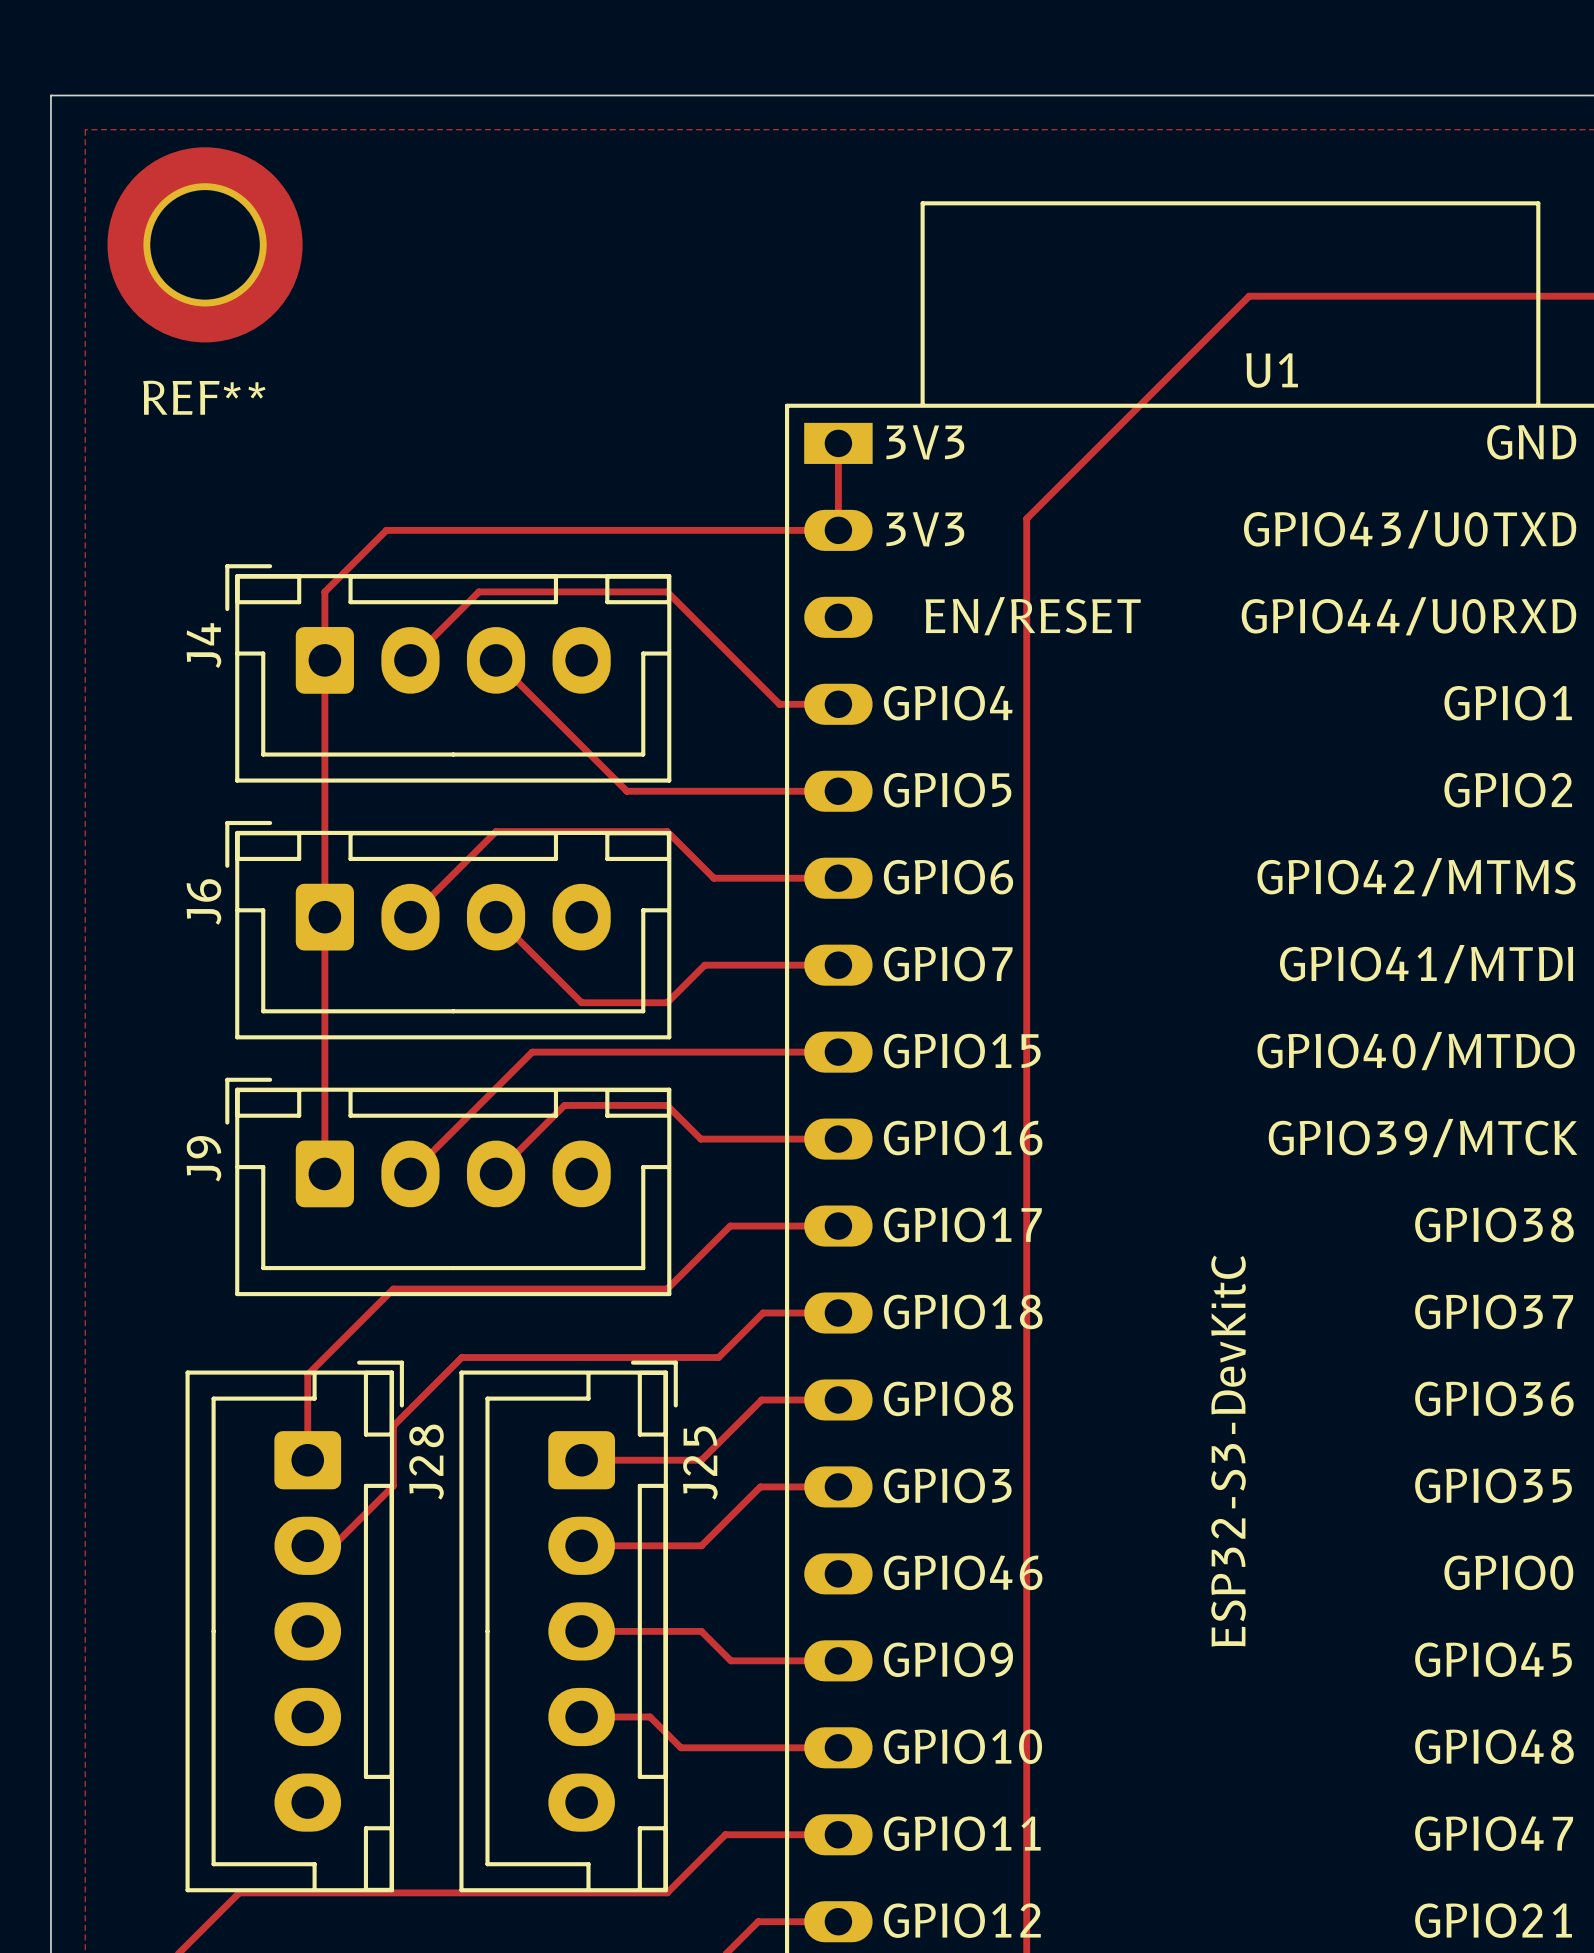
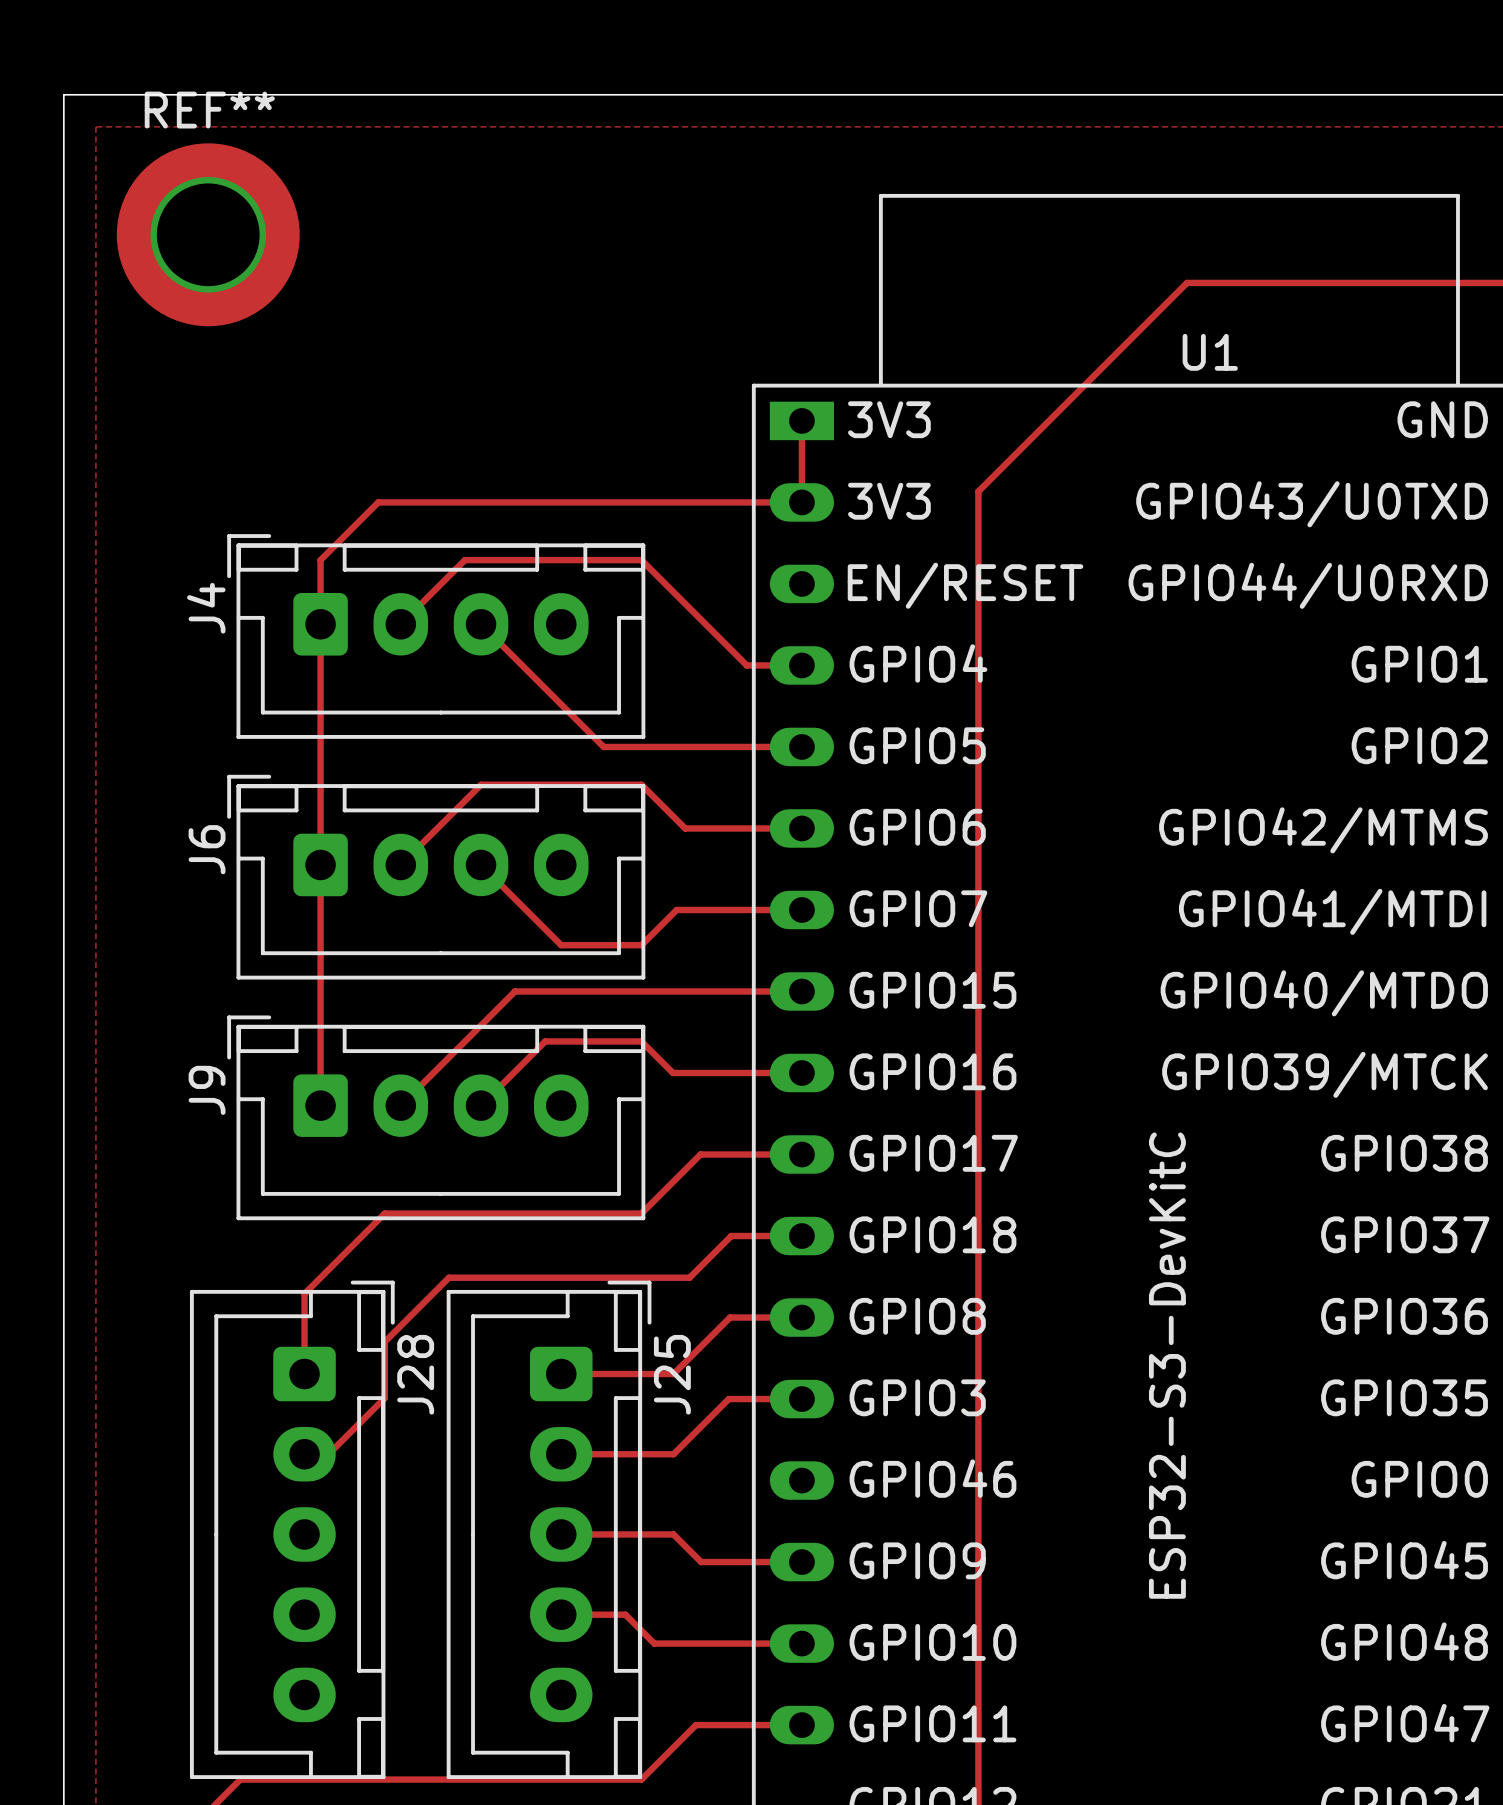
REF** name position: REF** (204, 397) -> REF** (209, 110)

